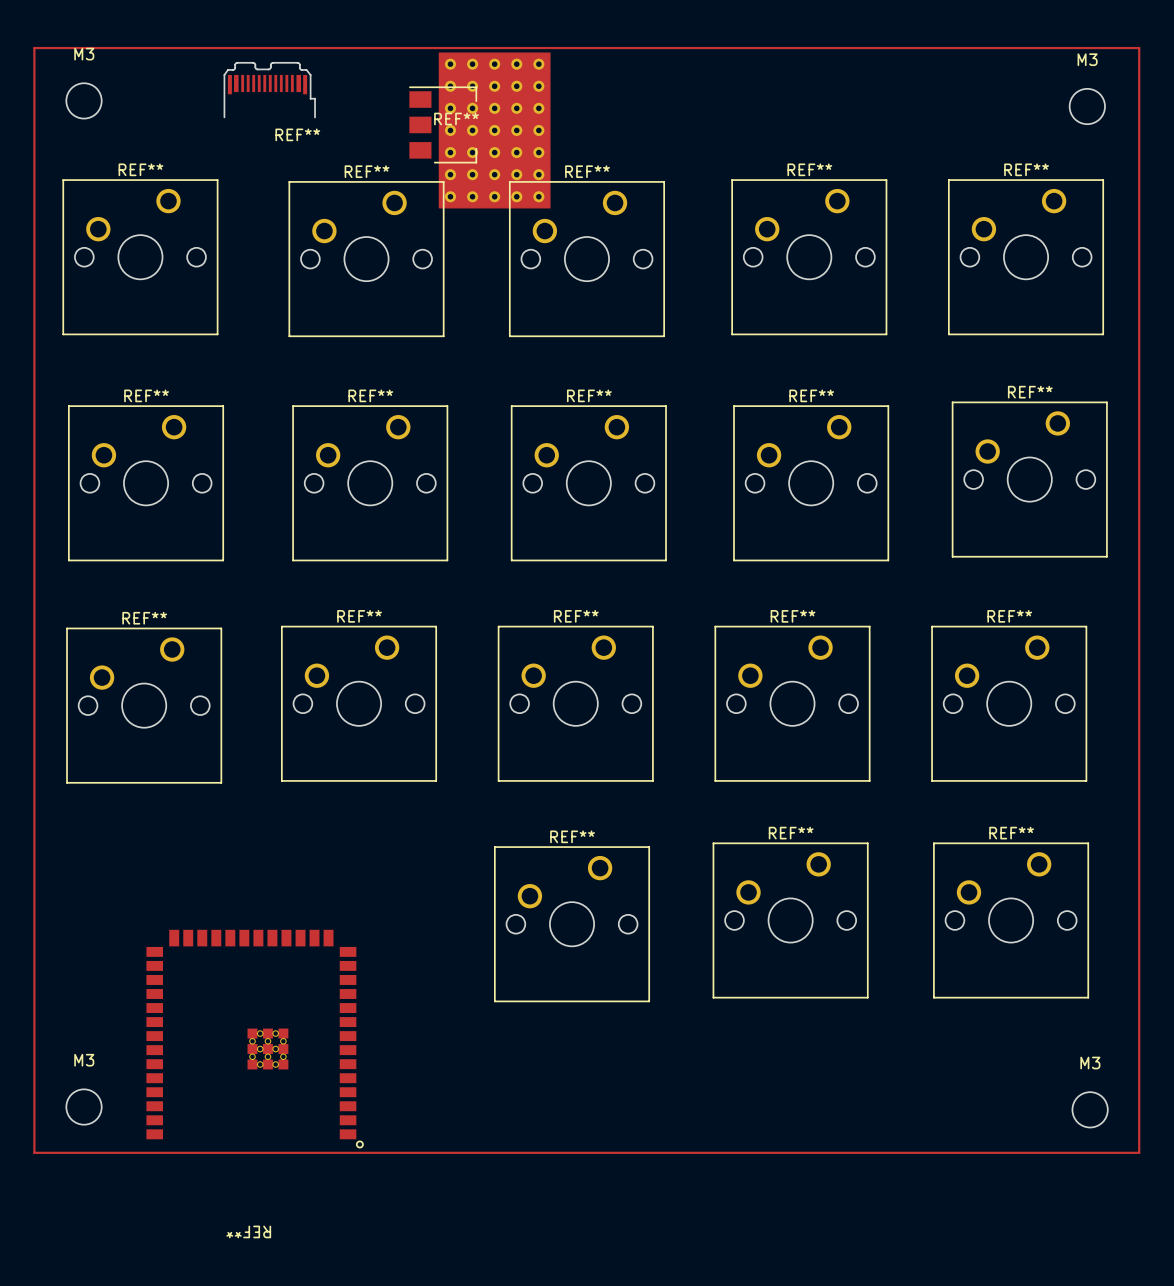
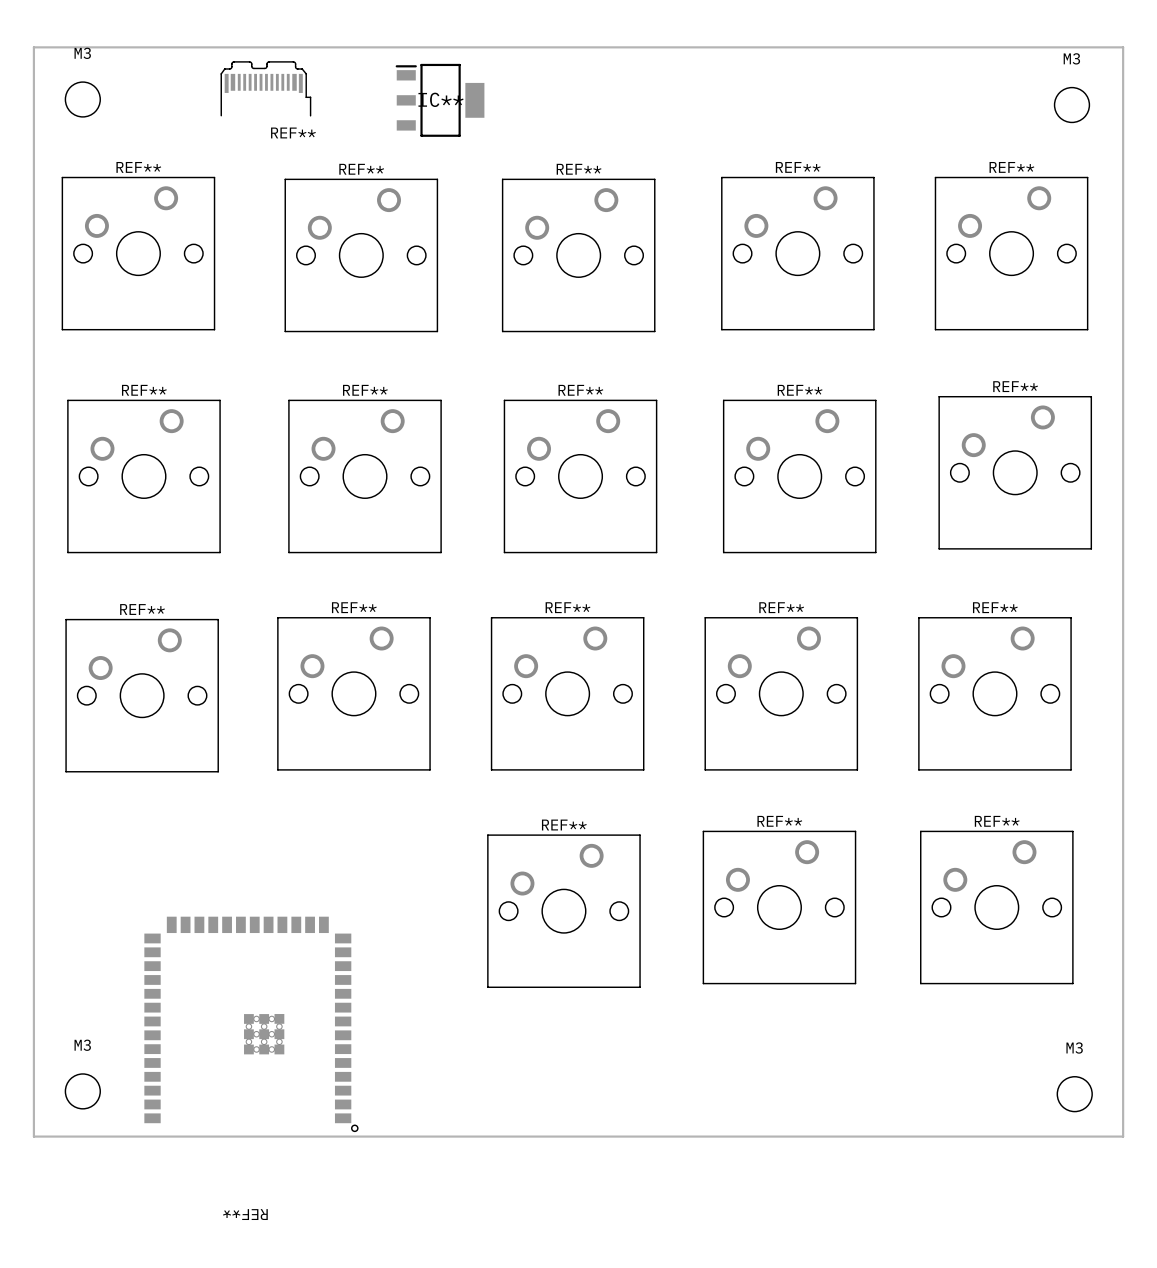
IC**: none -> (440, 100)
REF**: (479, 130) -> none

